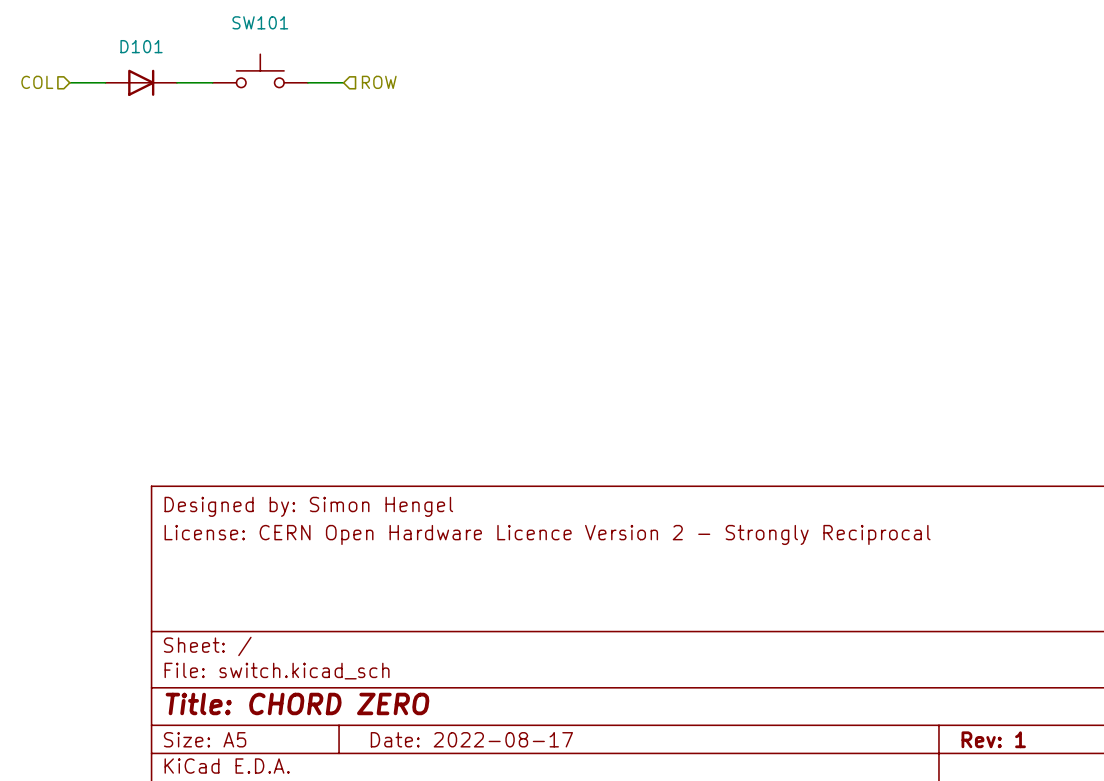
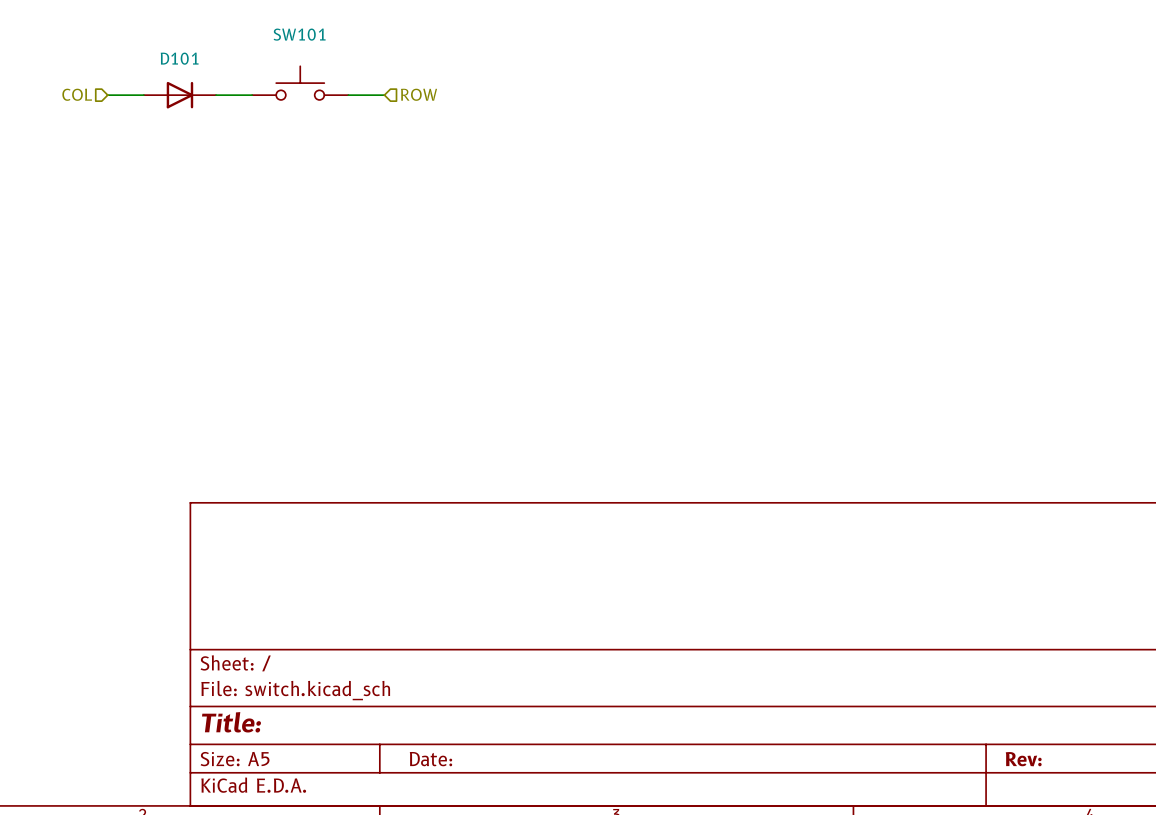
title block: Designed by: Simon Hengel (308, 506) -> none
title block: License: CERN Open Hardware Licence Version 2 - Strongly Reciprocal (547, 534) -> none
title block: Title: CHORD ZERO (297, 703) -> Title: (231, 722)
title block: Date: 2022-08-17 (471, 739) -> Date: (431, 759)
title block: Rev: 1 (993, 739) -> Rev: (1023, 759)

